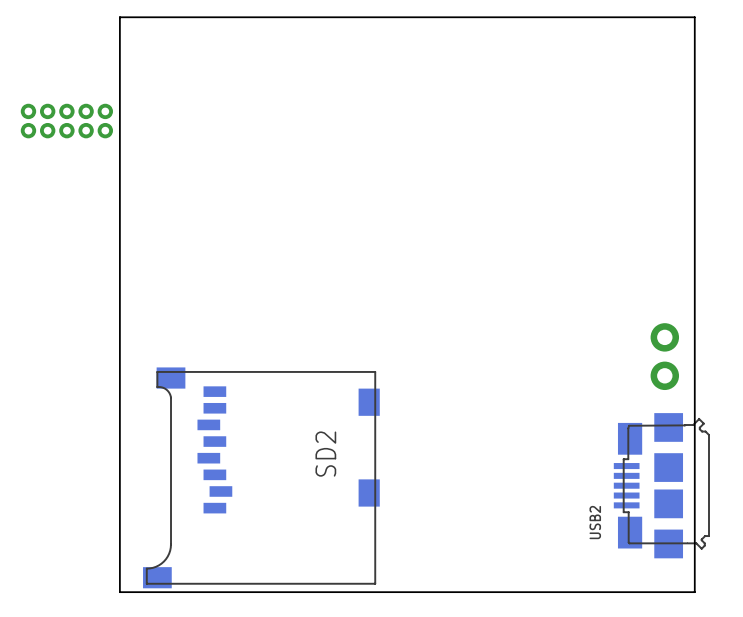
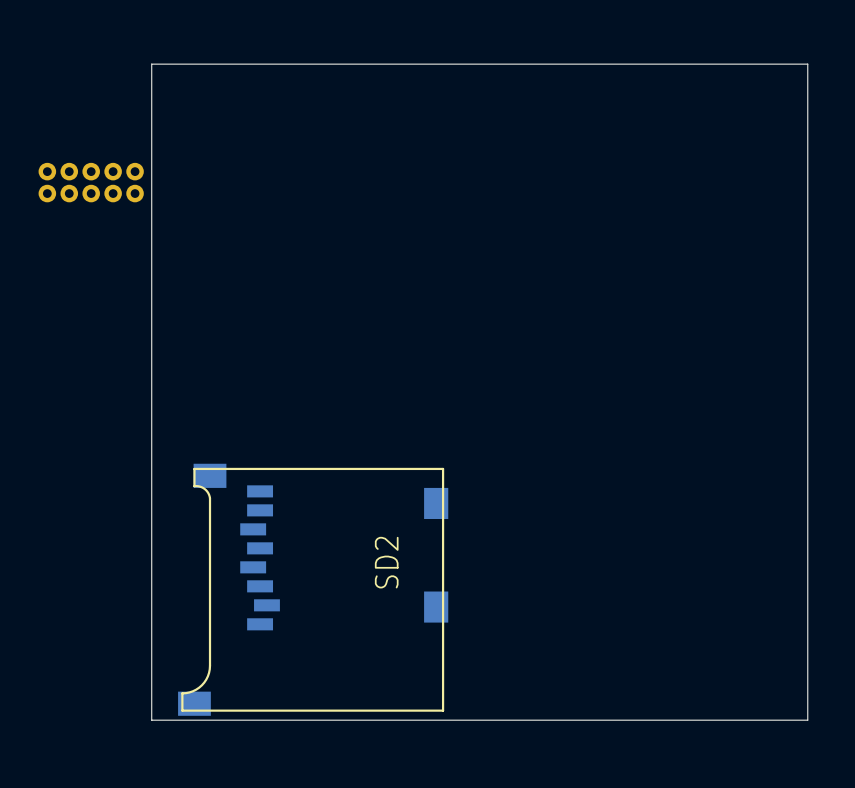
part: (664, 356) -> none
USB2: (661, 485) -> none

